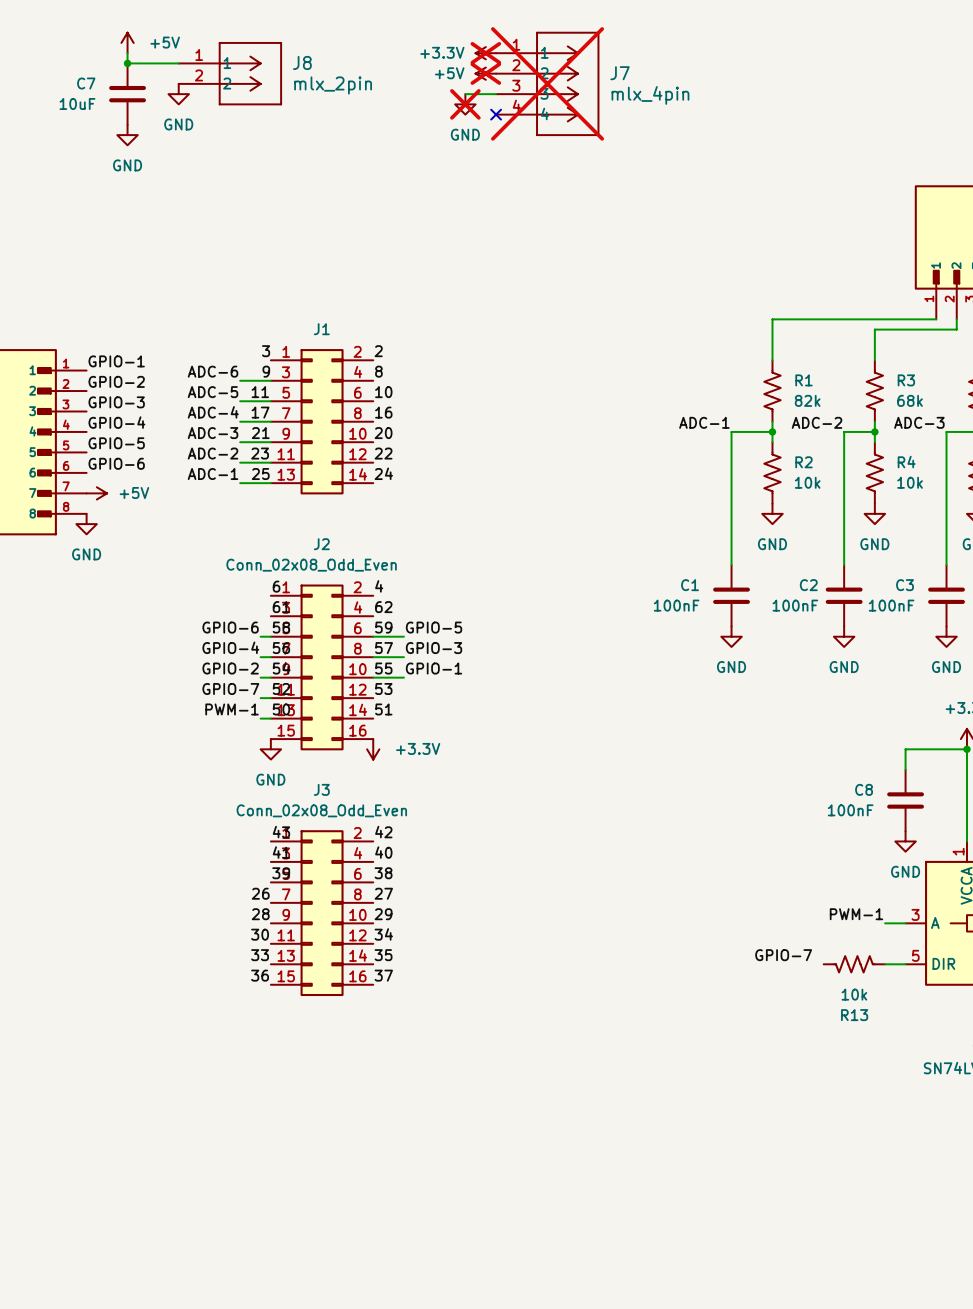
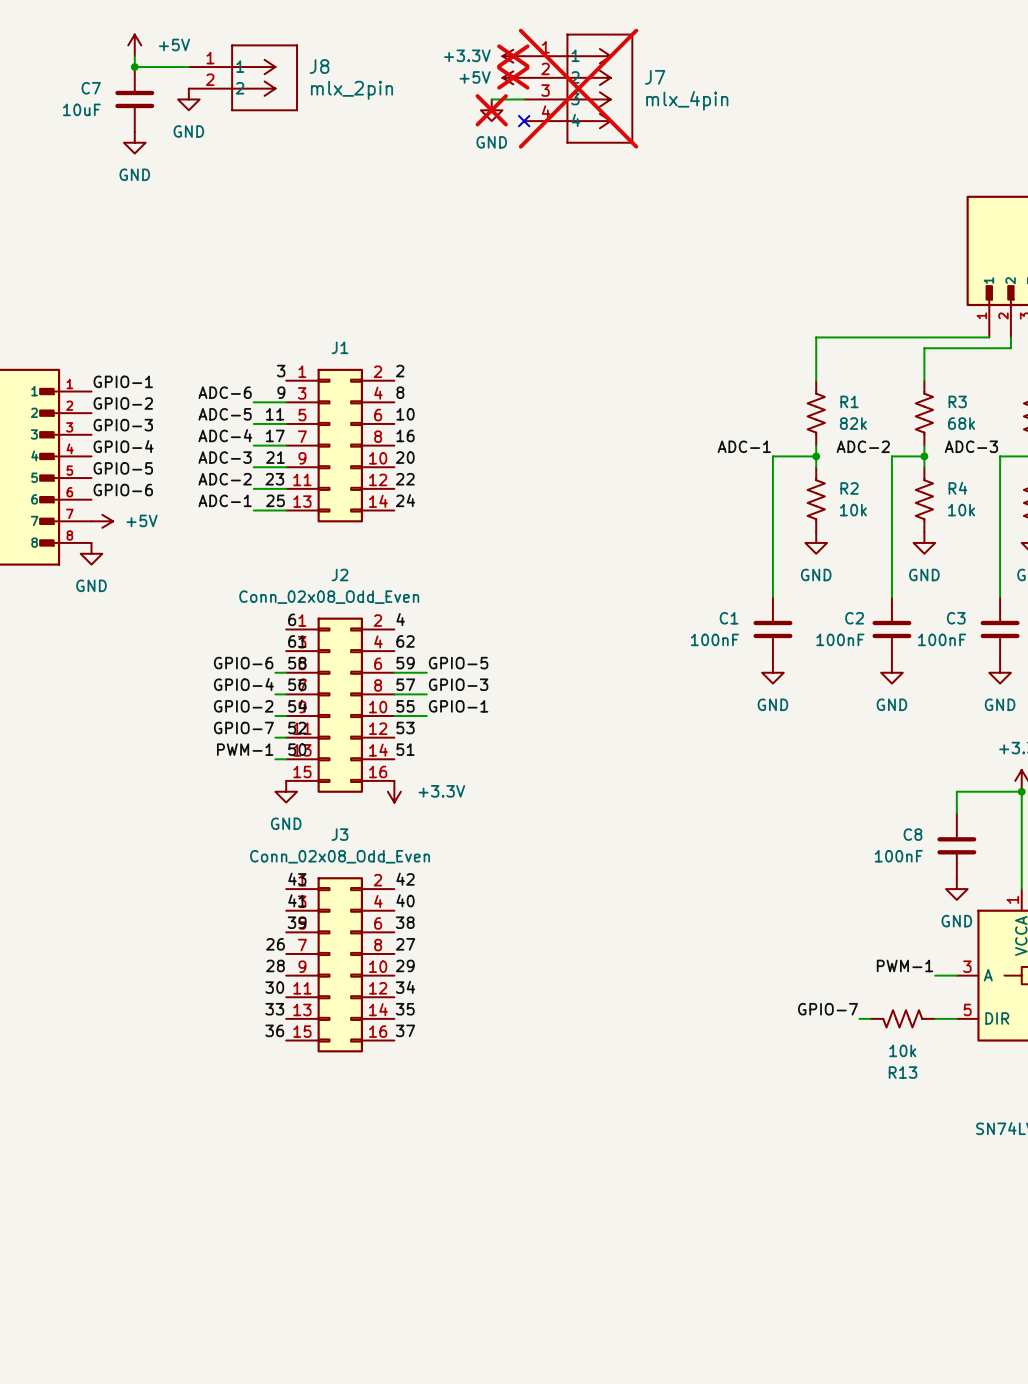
wire: none -> (859, 1018) (870, 1018)

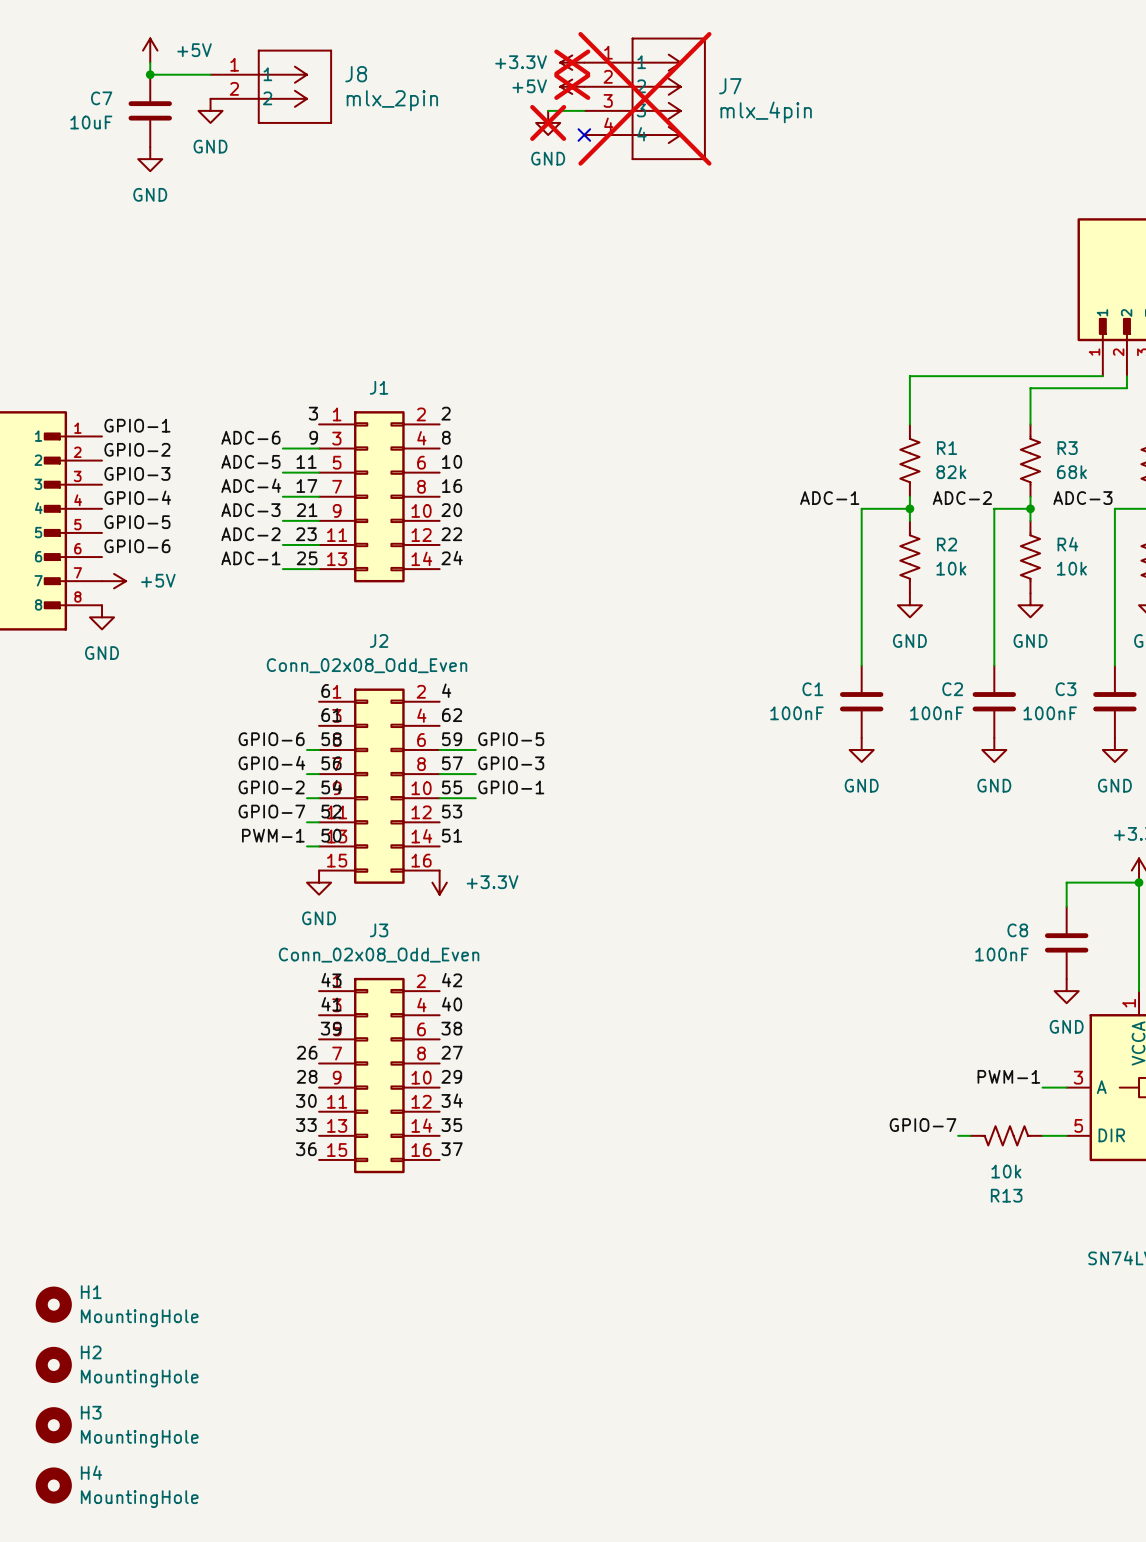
H1: none -> MountingHole (53, 1304)
H2: none -> MountingHole (53, 1364)
H3: none -> MountingHole (53, 1425)
H4: none -> MountingHole (53, 1485)

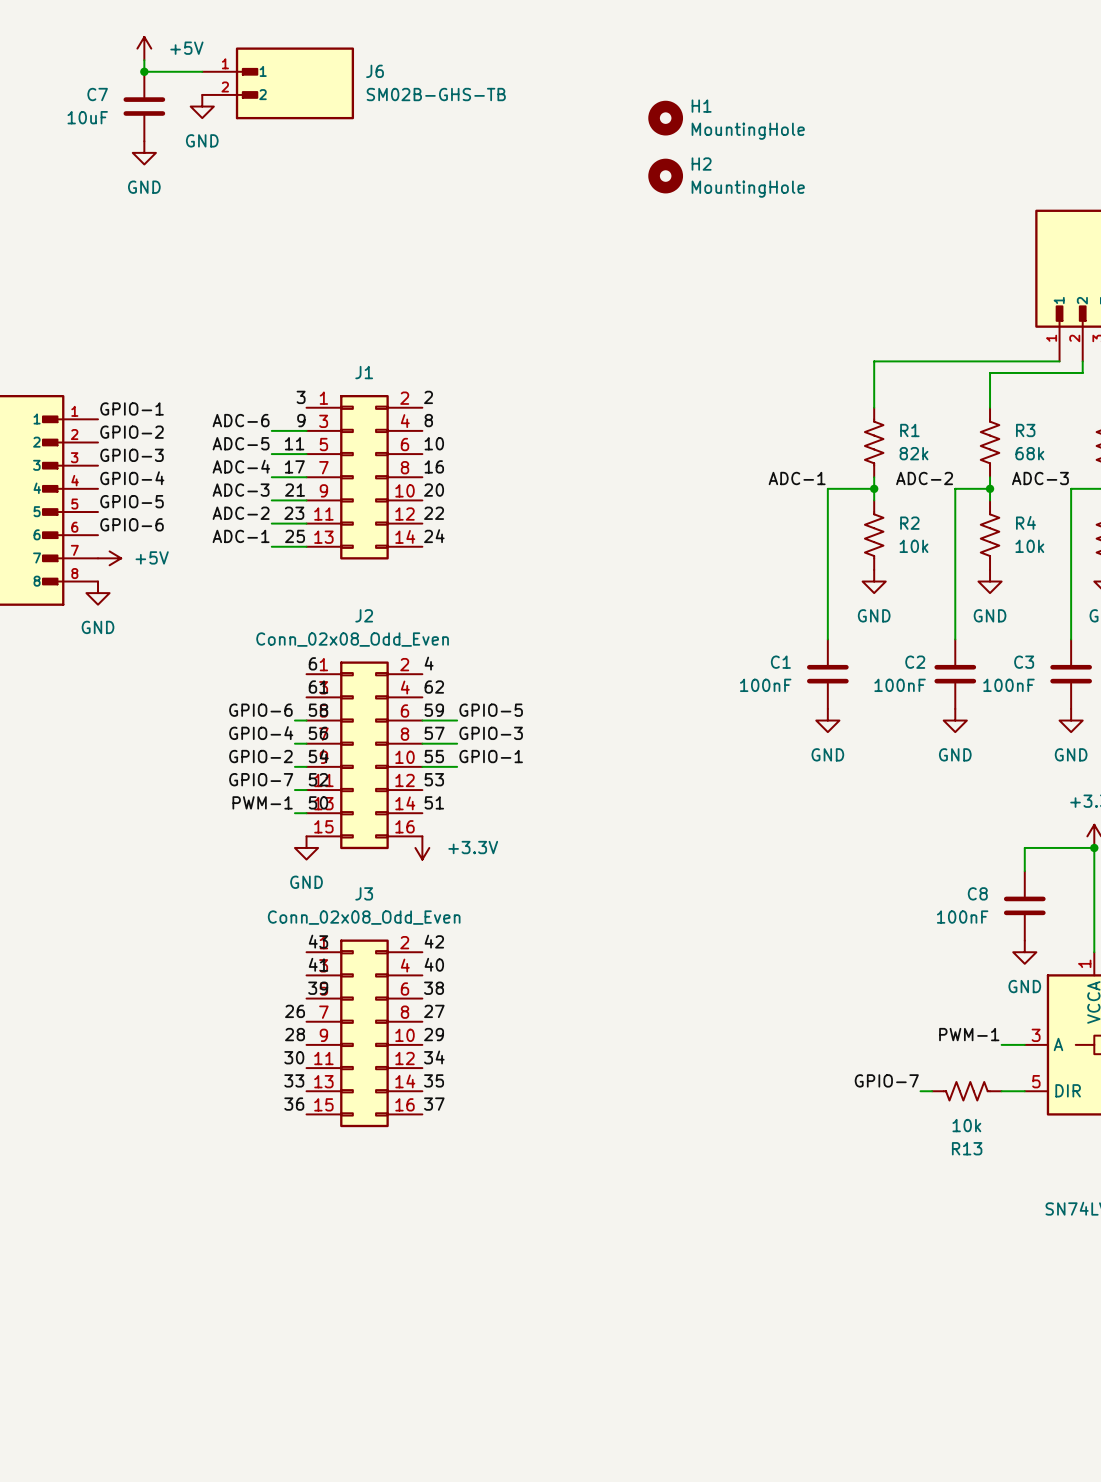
power symbol: +3.3V (572, 62) -> none
J8: mlx_2pin (271, 86) -> none
J6: none -> SM02B-GHS-TB (278, 83)
power symbol: +5V (572, 86) -> none
J7: mlx_4pin (644, 98) -> none
wire: (548, 110) (584, 110) -> none
power symbol: GND (548, 122) -> none
no-connect mark: (584, 135) -> none
H1 position: (53, 1304) -> (665, 118)
H2 position: (53, 1364) -> (665, 176)
H3: MountingHole (53, 1425) -> none
H4: MountingHole (53, 1485) -> none

